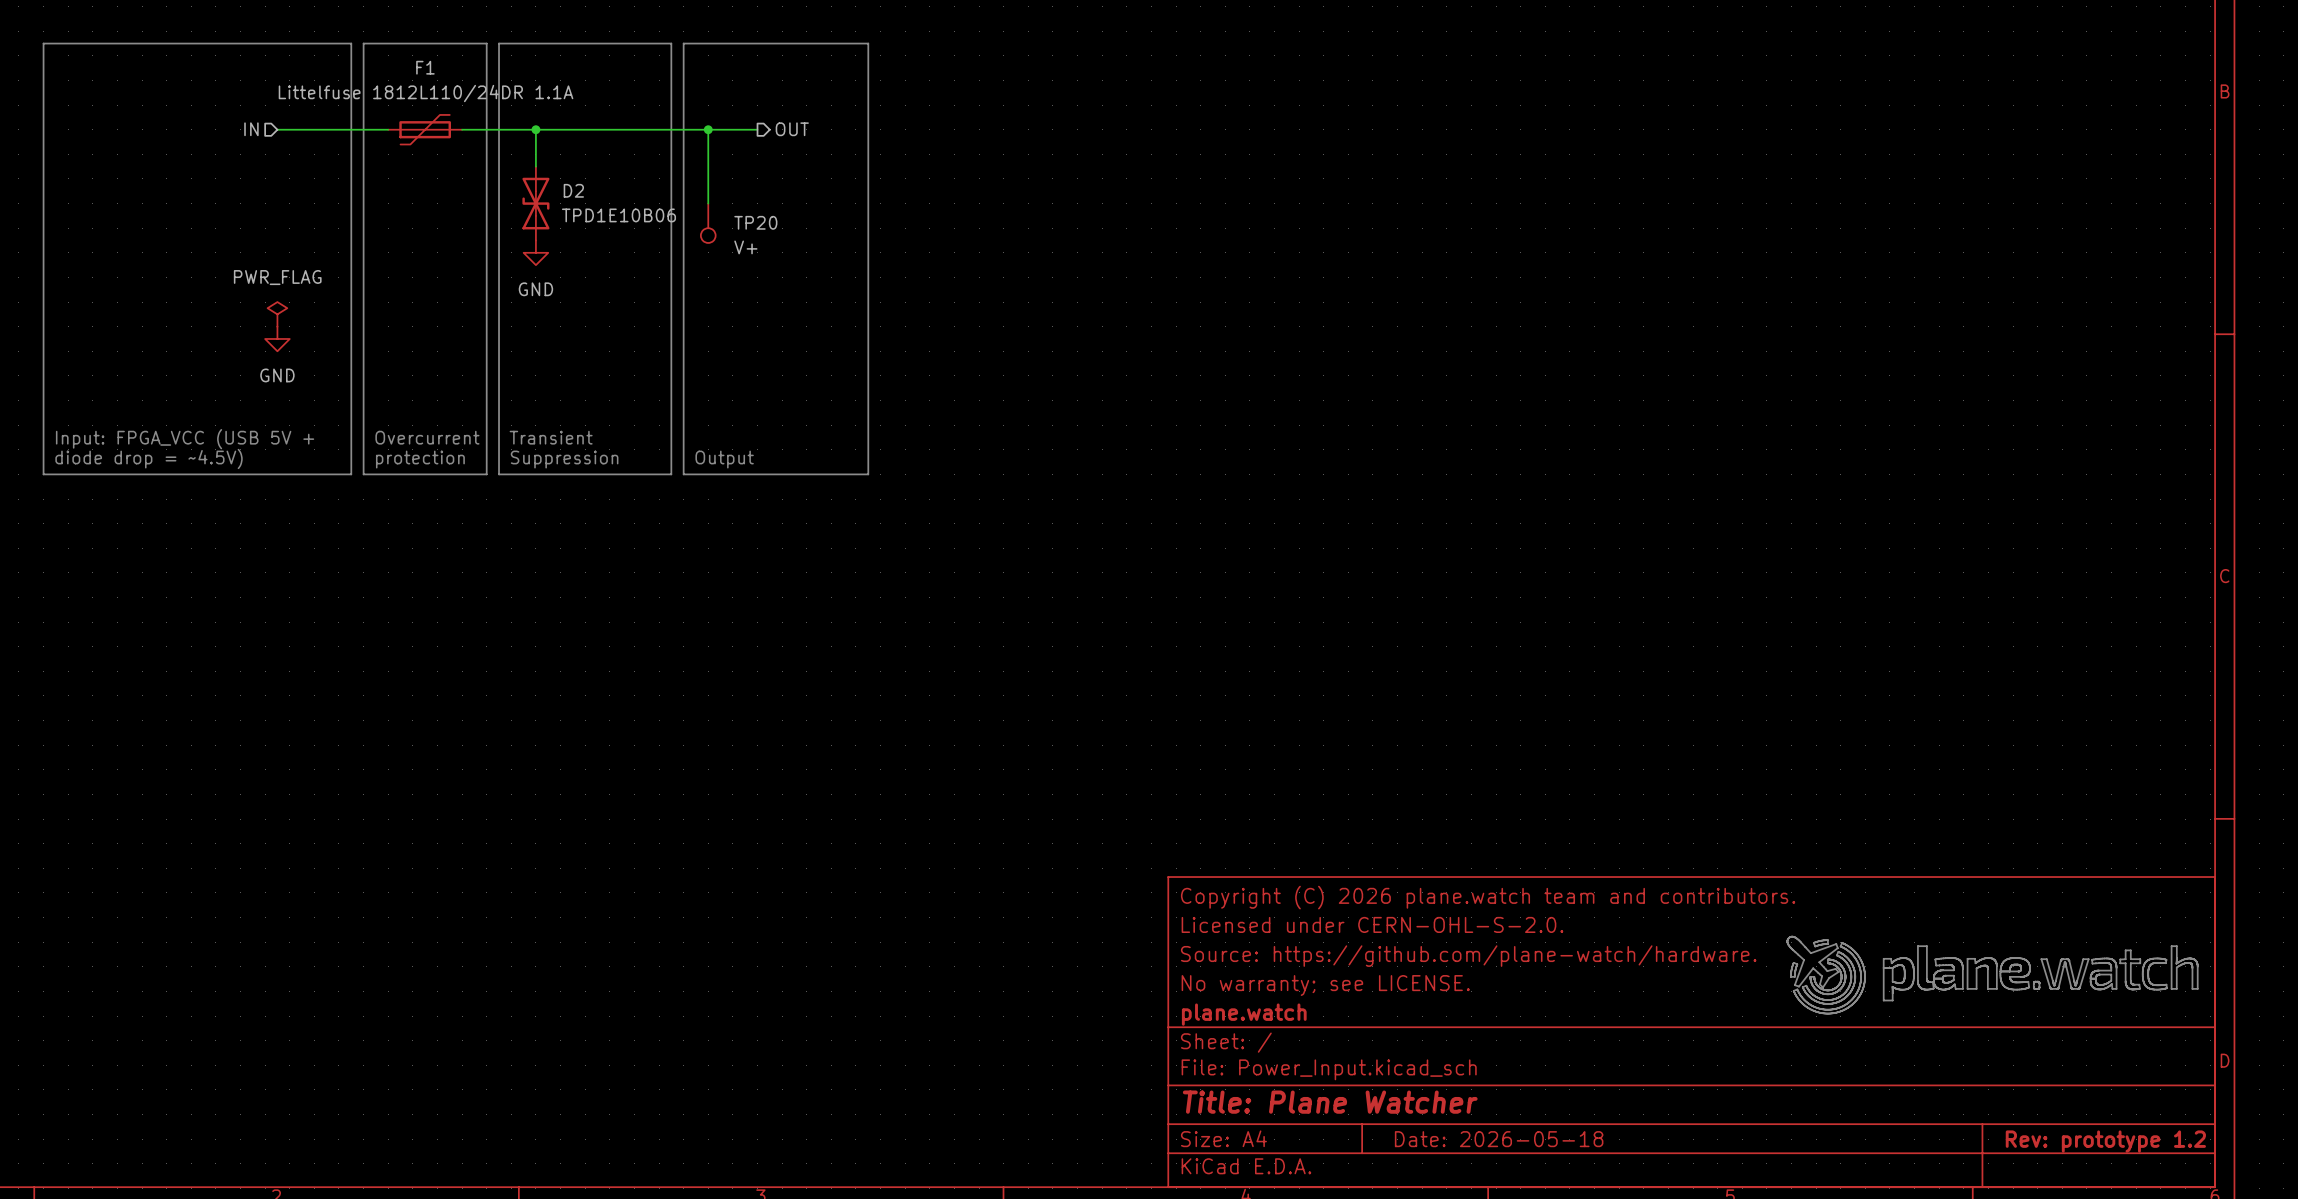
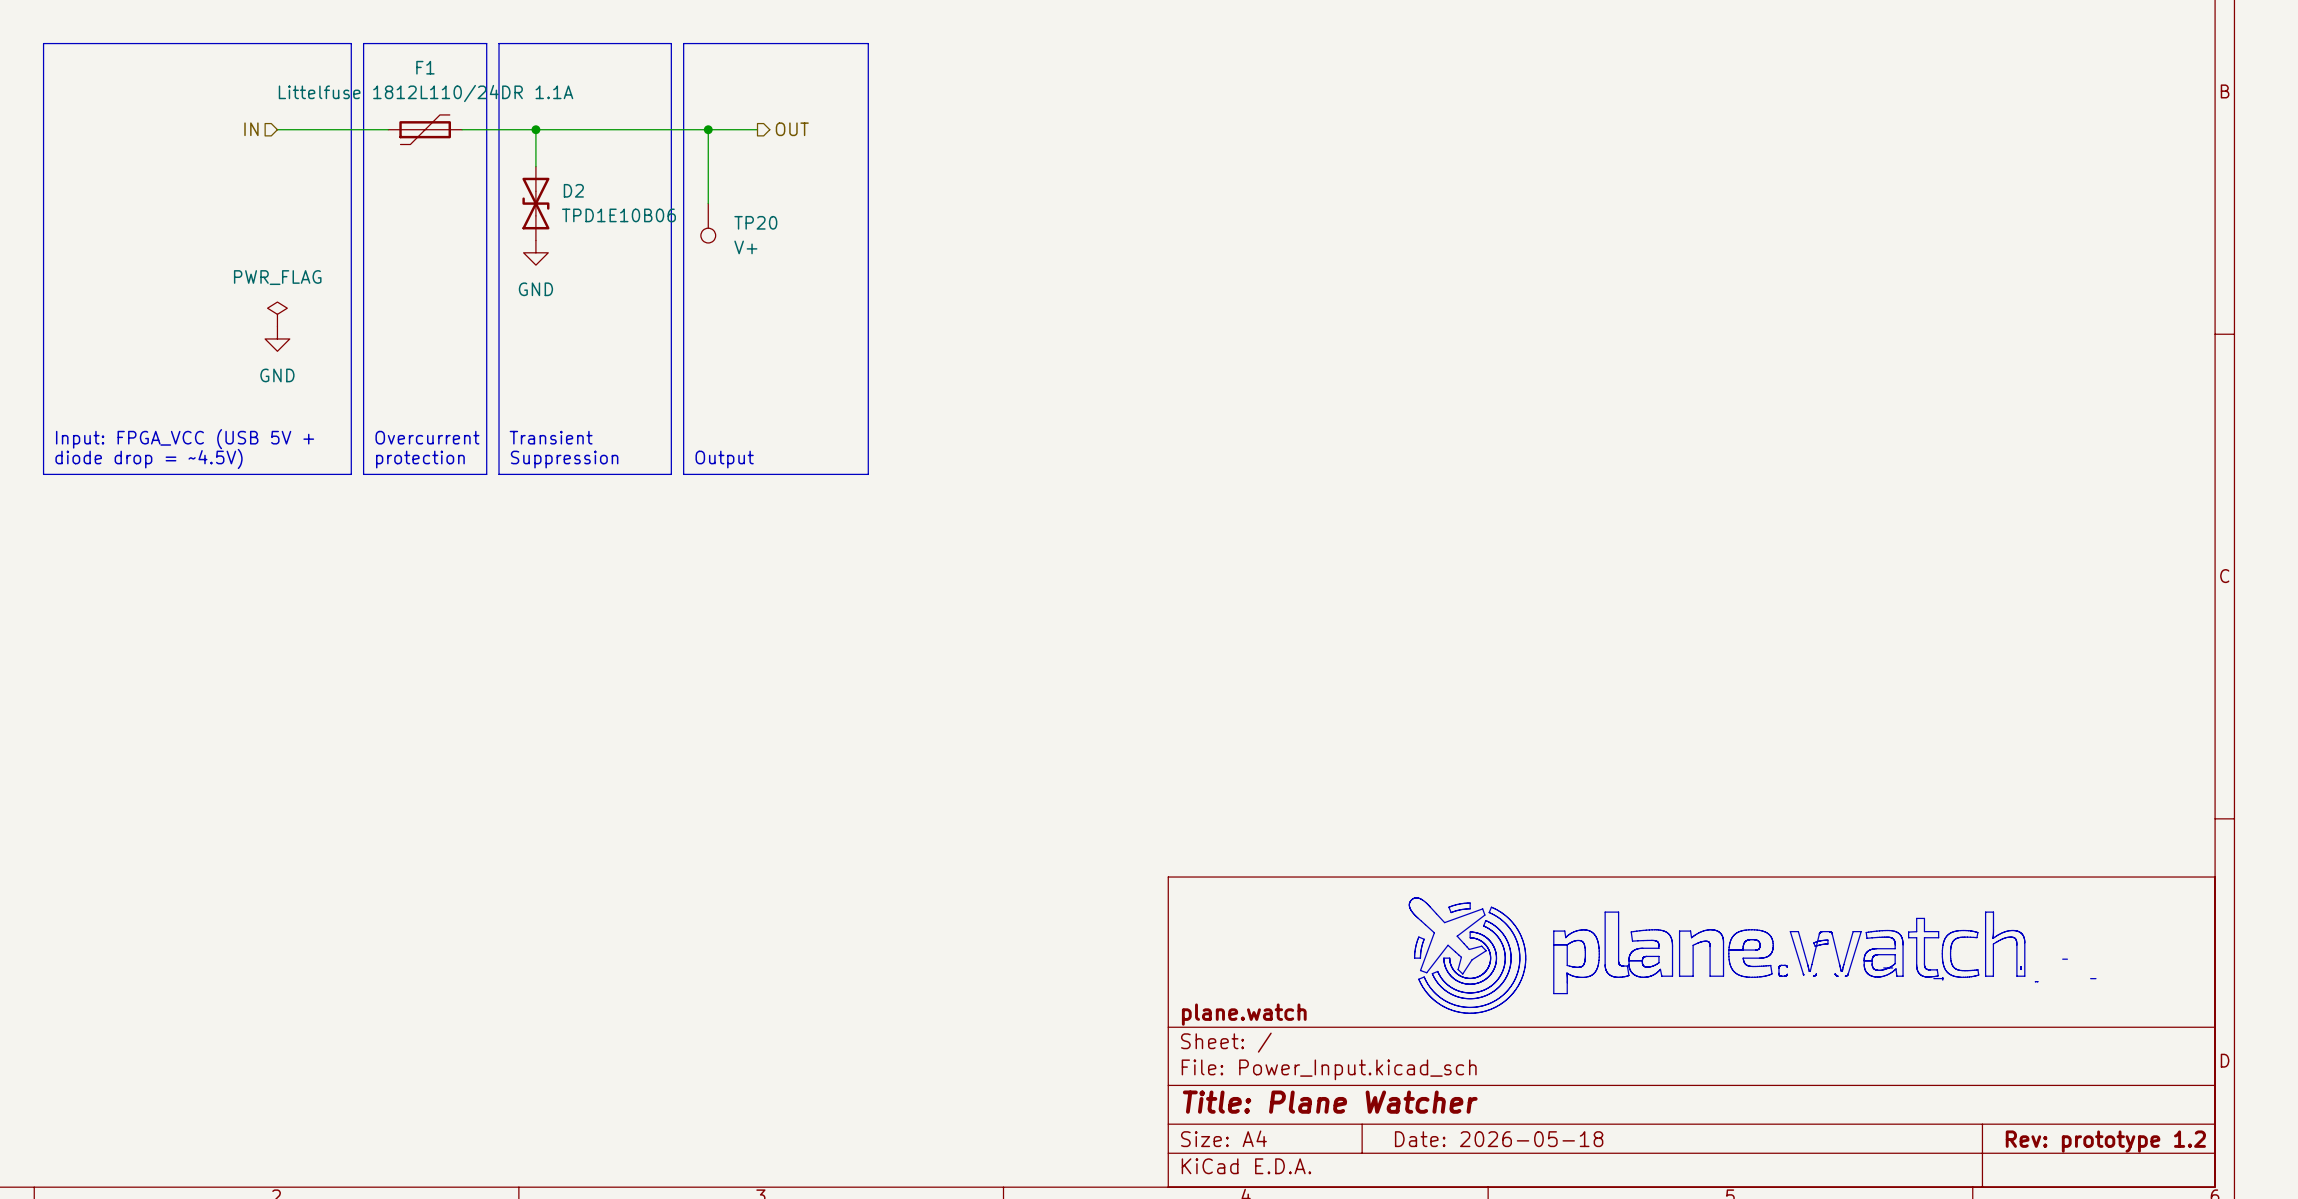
line: none -> (1415, 897) (1409, 902) (1410, 909) (1434, 932) (1420, 970) (1426, 972) (1448, 945) (1461, 957) (1458, 969) (1462, 973) (1471, 959) (1486, 950) (1481, 946) (1469, 949) (1457, 936) (1484, 915) (1482, 908) (1444, 922) (1425, 902) (1415, 897)
title block: Copyright (C) 2026 plane.watch team and contributors. (1488, 897) -> none
line: none -> (1470, 903) (1470, 908) (1451, 912) (1448, 907) (1470, 903)
line: none -> (1491, 907) (1489, 912) (1506, 924) (1517, 942) (1519, 960) (1515, 978) (1507, 990) (1497, 999) (1484, 1005) (1470, 1007) (1458, 1005) (1445, 1001) (1433, 991) (1424, 976) (1418, 979) (1430, 997) (1447, 1008) (1468, 1013) (1490, 1009) (1508, 998) (1521, 980) (1525, 958) (1521, 937) (1509, 919) (1491, 907)
line: none -> (1605, 912) (1606, 970) (1613, 976) (1627, 975) (1627, 966) (1621, 965) (1618, 962) (1618, 912) (1605, 912)
line: none -> (1985, 912) (1993, 912) (1992, 938) (2010, 930) (2017, 931) (2023, 935) (2024, 976) (2016, 976) (2016, 942) (2014, 938) (2010, 937) (1993, 944) (1993, 976) (1985, 976) (1985, 912)
line: none -> (1916, 918) (1916, 931) (1908, 932) (1908, 937) (1916, 937) (1917, 970) (1924, 976) (1938, 975) (1937, 969) (1928, 969) (1924, 966) (1924, 937) (1938, 937) (1938, 931) (1924, 931) (1924, 918) (1916, 918)
line: none -> (1485, 920) (1483, 925) (1495, 934) (1503, 947) (1505, 959) (1502, 972) (1489, 987) (1471, 992) (1460, 991) (1450, 987) (1442, 980) (1437, 971) (1432, 973) (1441, 986) (1453, 995) (1469, 998) (1484, 996) (1498, 987) (1507, 974) (1511, 959) (1508, 943) (1499, 930) (1485, 920)
title block: Licensed under CERN-OHL-S-2.0. (1372, 924) -> none
line: none -> (1583, 929) (1573, 932) (1565, 937) (1564, 931) (1553, 931) (1553, 993) (1567, 993) (1566, 972) (1575, 976) (1586, 977) (1592, 974) (1596, 969) (1599, 957) (1597, 940) (1592, 932) (1583, 929)
line: none -> (1654, 929) (1631, 931) (1632, 941) (1655, 940) (1658, 943) (1658, 948) (1640, 948) (1633, 950) (1629, 957) (1629, 969) (1633, 974) (1640, 977) (1651, 975) (1660, 969) (1661, 976) (1672, 976) (1671, 938) (1665, 931) (1654, 929)
line: none -> (1710, 929) (1701, 931) (1691, 937) (1690, 931) (1679, 931) (1679, 976) (1693, 976) (1693, 945) (1705, 941) (1709, 944) (1710, 976) (1723, 976) (1722, 937) (1718, 931) (1710, 929)
line: none -> (1885, 930) (1866, 932) (1866, 938) (1891, 937) (1894, 940) (1895, 948) (1875, 948) (1868, 950) (1864, 957) (1865, 969) (1869, 975) (1878, 977) (1887, 974) (1895, 968) (1896, 976) (1903, 976) (1901, 937) (1896, 931) (1885, 930)
line: none -> (1963, 930) (1951, 932) (1944, 938) (1942, 950) (1944, 966) (1948, 973) (1955, 976) (1978, 975) (1977, 969) (1958, 970) (1951, 963) (1950, 949) (1954, 940) (1961, 937) (1976, 937) (1977, 932) (1963, 930)
line: none -> (1822, 931) (1829, 931)
line: none -> (1470, 932) (1470, 937) (1481, 941) (1489, 951) (1490, 962) (1484, 972) (1474, 977) (1463, 977) (1453, 969) (1449, 958) (1443, 958) (1445, 968) (1451, 976) (1460, 982) (1470, 984) (1480, 982) (1488, 976) (1494, 968) (1496, 958) (1494, 948) (1488, 939) (1480, 934) (1470, 932)
line: none -> (1831, 933) (1842, 971) (1853, 931) (1861, 931) (1848, 974)
line: none -> (1819, 934) (1809, 971) (1798, 931) (1790, 931) (1803, 974)
line: (1791, 936) (1787, 939) (1788, 944) (1804, 959) (1794, 985) (1799, 986) (1813, 968) (1822, 976) (1819, 984) (1823, 987) (1829, 978) (1838, 971) (1835, 968) (1827, 971) (1819, 962) (1837, 948) (1836, 944) (1810, 953) (1798, 939) (1791, 936) -> none
line: none -> (1418, 937) (1415, 947) (1414, 958) (1420, 958) (1424, 939) (1418, 937)
line: (1842, 942) (1840, 946) (1851, 954) (1859, 966) (1861, 978) (1858, 990) (1846, 1004) (1827, 1009) (1811, 1005) (1803, 998) (1797, 989) (1793, 990) (1801, 1002) (1812, 1010) (1827, 1013) (1842, 1010) (1854, 1002) (1862, 990) (1865, 976) (1862, 962) (1854, 950) (1842, 942) -> none
line: none -> (1553, 944) (1567, 944)
line: none -> (1567, 944) (1567, 965) (1582, 966) (1585, 957) (1583, 942) (1576, 940) (1567, 944)
line: (2171, 946) (2171, 988) (2176, 988) (2176, 967) (2188, 962) (2192, 966) (2192, 988) (2197, 988) (2196, 961) (2188, 958) (2176, 963) (2176, 946) (2171, 946) -> none
line: none -> (1728, 950) (1730, 965) (1737, 974) (1752, 977) (1772, 973) (1770, 965) (1748, 966) (1745, 963) (1743, 958) (1763, 957) (1770, 954) (1772, 941) (1766, 932) (1751, 929) (1738, 932) (1731, 938) (1728, 950)
line: none -> (1728, 950) (1755, 950) (1757, 949) (1759, 947) (1759, 942) (1755, 939) (1746, 940) (1744, 943) (1743, 945) (1743, 947) (1743, 948) (1742, 950)
line: (1838, 951) (1836, 955) (1845, 961) (1850, 970) (1849, 986) (1840, 996) (1828, 1000) (1815, 996) (1806, 985) (1802, 987) (1808, 995) (1816, 1001) (1827, 1003) (1837, 1002) (1846, 996) (1852, 987) (1855, 977) (1853, 966) (1847, 957) (1838, 951) -> none
title block: Source: https://github.com/plane-watch/hardware. (1468, 956) -> none
line: none -> (1643, 957) (1658, 956) (1658, 962) (1646, 967) (1643, 965) (1642, 960)
line: none -> (1642, 958) (1642, 960)
line: (1902, 958) (1891, 963) (1891, 958) (1883, 958) (1883, 1000) (1892, 1000) (1892, 986) (1905, 989) (1912, 984) (1912, 964) (1908, 959) (1902, 958) -> none
line: (2104, 958) (2092, 959) (2092, 963) (2108, 963) (2111, 970) (2093, 972) (2090, 976) (2091, 984) (2094, 988) (2100, 989) (2111, 984) (2112, 988) (2116, 988) (2115, 962) (2112, 959) (2104, 958) -> none
line: (2156, 958) (2149, 959) (2144, 964) (2143, 982) (2151, 989) (2167, 988) (2166, 984) (2153, 984) (2148, 980) (2148, 971) (2150, 964) (2165, 963) (2166, 959) (2156, 958) -> none
line: (1827, 959) (1827, 963) (1835, 965) (1840, 972) (1841, 979) (1837, 986) (1830, 990) (1823, 989) (1816, 984) (1814, 976) (1810, 976) (1815, 989) (1827, 994) (1840, 989) (1845, 976) (1840, 964) (1827, 959) -> none
line: none -> (1864, 960) (1872, 960)
line: none -> (1872, 960) (1874, 969) (1883, 969) (1895, 963) (1895, 954) (1875, 954) (1872, 960)
line: (2060, 960) (2053, 985) (2046, 959) (2041, 959) (2050, 987) -> none
line: (2069, 960) (2076, 985) (2083, 959) (2088, 959) (2079, 987) -> none
line: (1793, 962) (1791, 969) (1790, 976) (1794, 976) (1797, 964) (1793, 962) -> none
line: none -> (1781, 965) (1785, 965)
line: (1899, 965) (1903, 966) (1904, 970) (1904, 980) (1900, 982) (1892, 981) (1892, 967) (1899, 965) -> none
line: (1952, 965) (1936, 965) (1935, 959) (1952, 957) (1960, 960) (1962, 967) (1962, 988) (1955, 988) (1954, 984) (1946, 989) (1936, 987) (1933, 981) (1935, 973) (1940, 970) (1953, 970) (1953, 966) -> none
line: (1986, 965) (1976, 968) (1976, 988) (1967, 988) (1967, 958) (1974, 958) (1975, 963) (1988, 957) (1993, 959) (1996, 963) (1996, 988) (1987, 988) (1987, 967) -> none
line: (2019, 965) (2011, 965) (2009, 971) -> none
line: none -> (1779, 967) (1779, 974)
line: (2000, 971) (2001, 981) (2006, 987) (2016, 989) (2029, 987) (2028, 981) (2013, 982) (2010, 977) (2028, 974) (2029, 966) (2025, 959) (2015, 957) (2006, 959) (2002, 963) (2000, 971) -> none
line: (2000, 971) (2018, 971) -> none
line: (2097, 974) (2111, 974) (2111, 980) (2098, 984) (2096, 982) (2096, 976) -> none
line: (1945, 975) (1953, 975) (1953, 979) (1945, 982) -> none
line: none -> (1781, 976) (1785, 976)
line: (1926, 979) (1926, 946) (1917, 946) (1918, 984) (1923, 989) (1933, 988) (1932, 982) (1929, 982) -> none
line: (2131, 982) (2130, 963) (2140, 963) (2140, 959) (2130, 959) (2130, 950) (2125, 950) (2125, 959) (2120, 959) (2120, 963) (2125, 963) (2126, 985) (2130, 989) (2139, 988) (2139, 984) (2132, 984) -> none
line: (2033, 983) (2033, 987) -> none
line: (2039, 983) (2039, 987) -> none
title block: No warranty; see LICENSE. (1325, 985) -> none
line: (2058, 987) (2064, 962) (2071, 987) -> none
line: (2035, 988) (2038, 988) -> none
line: (2052, 988) (2056, 988) -> none
line: (2073, 988) (2077, 988) -> none

